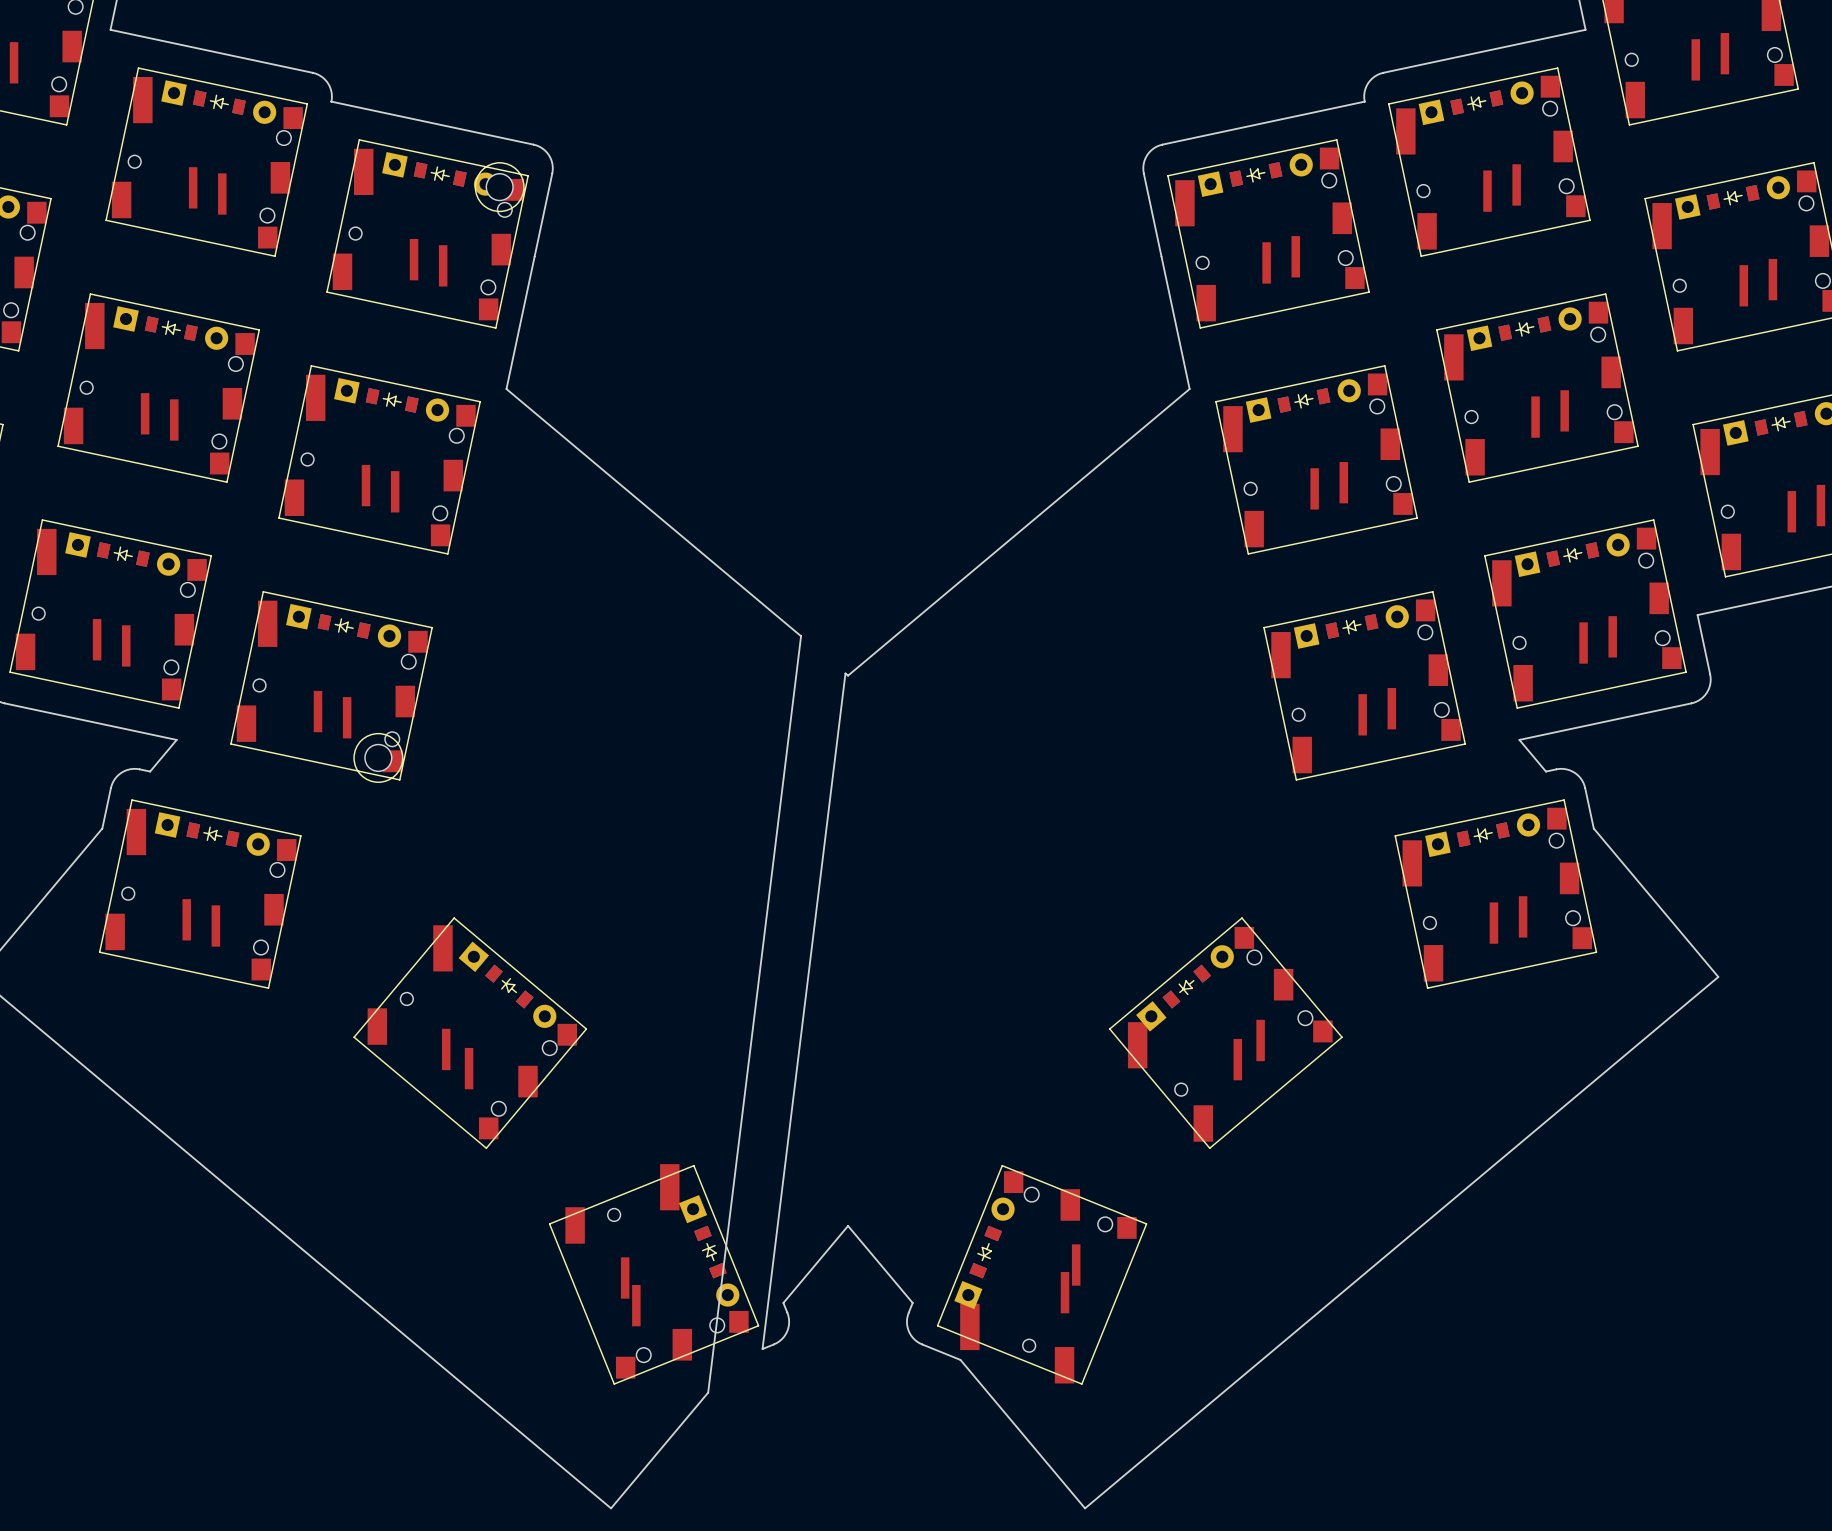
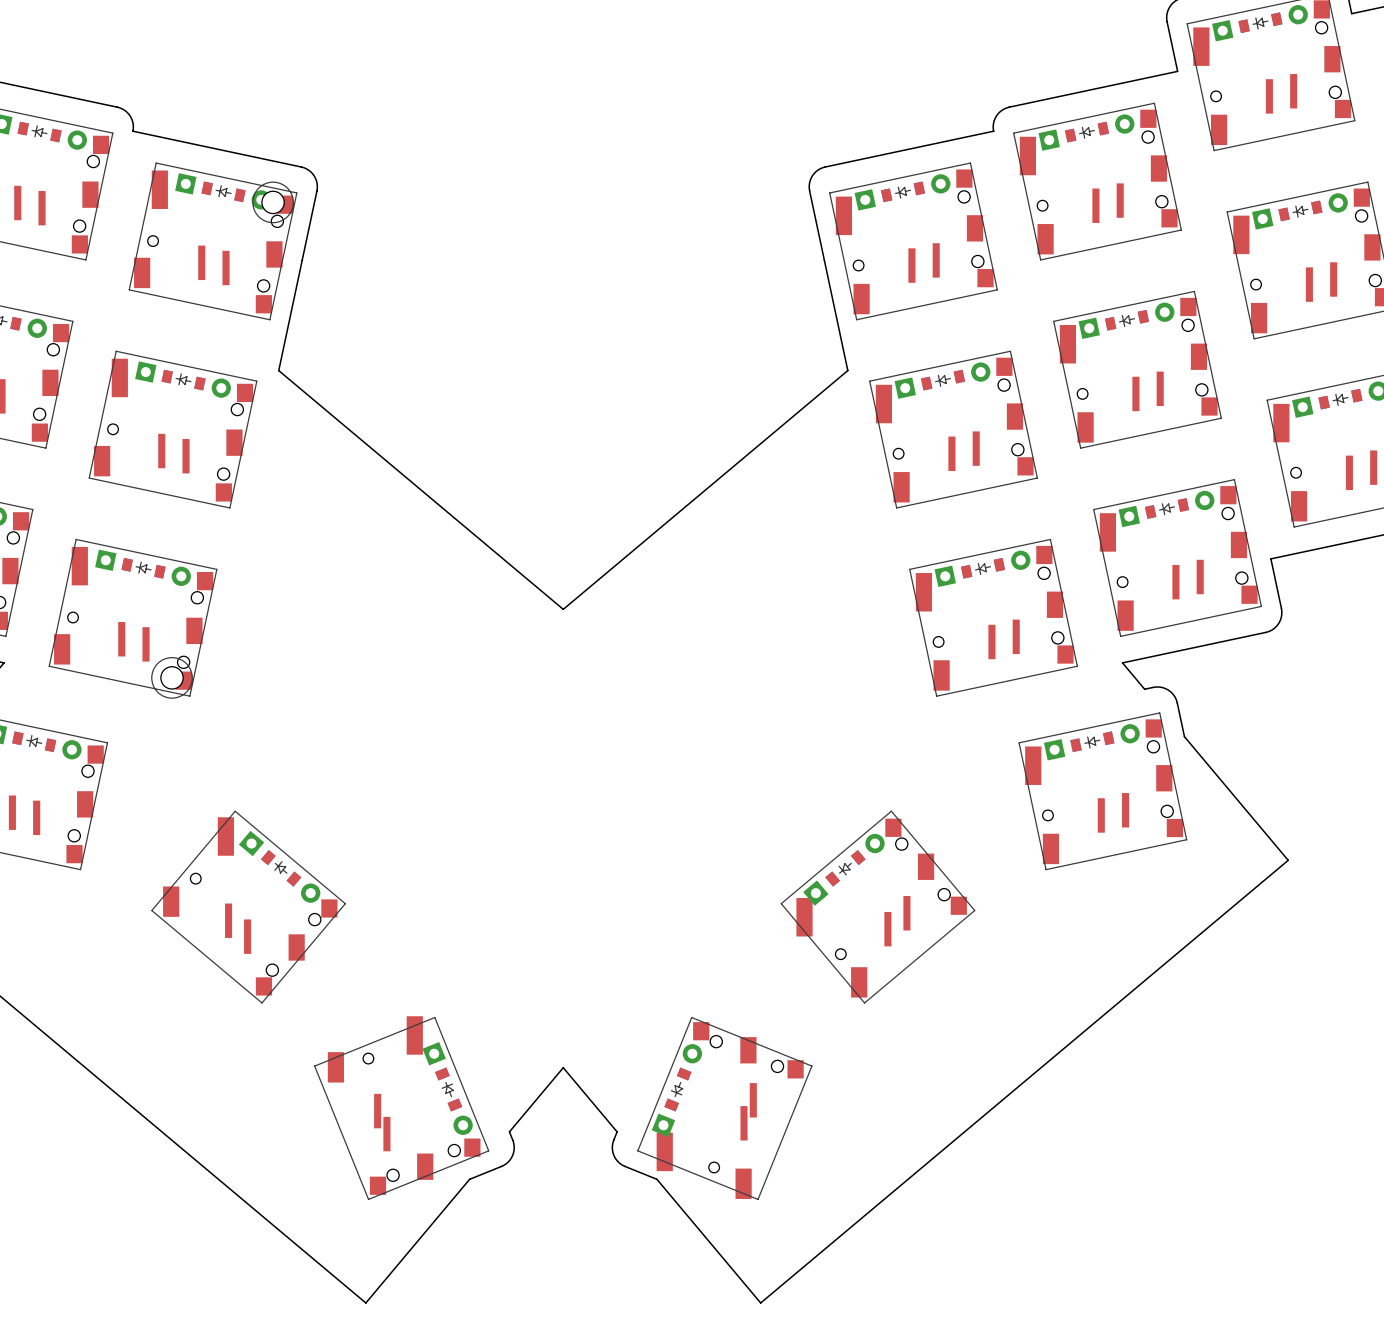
board edge: (801, 636) (708, 1392) -> (492, 1170) (469, 1179) (446, 1206)
board edge: (845, 673) (762, 1349) -> (561, 607) (524, 576)

